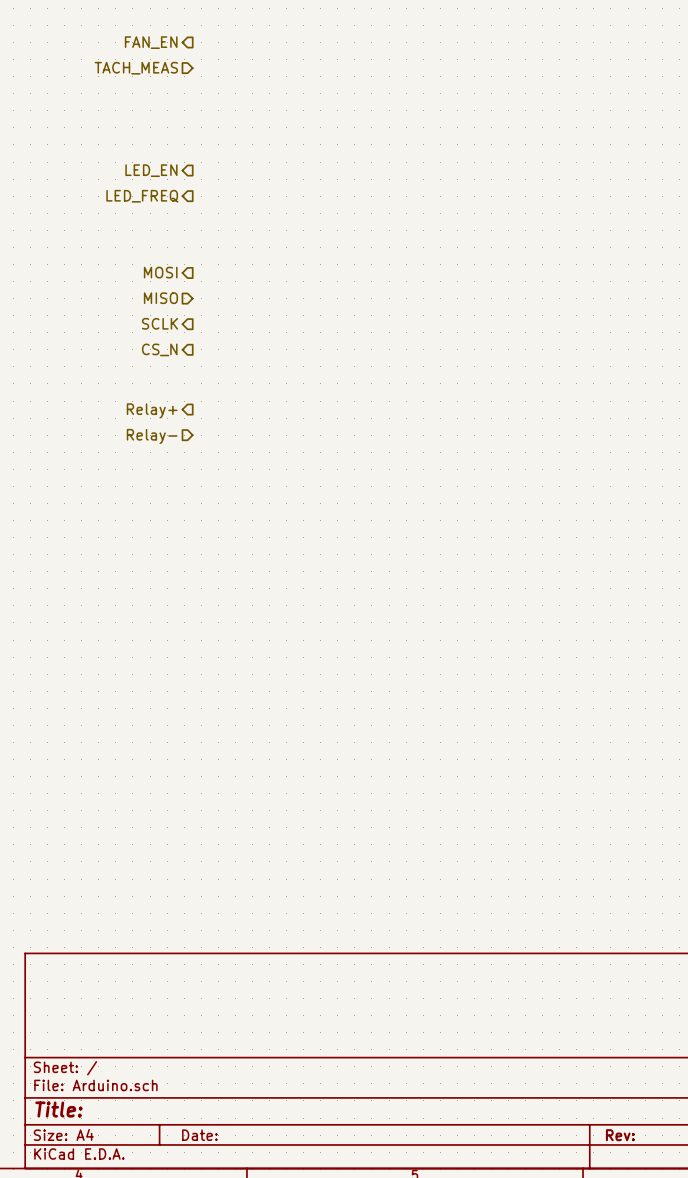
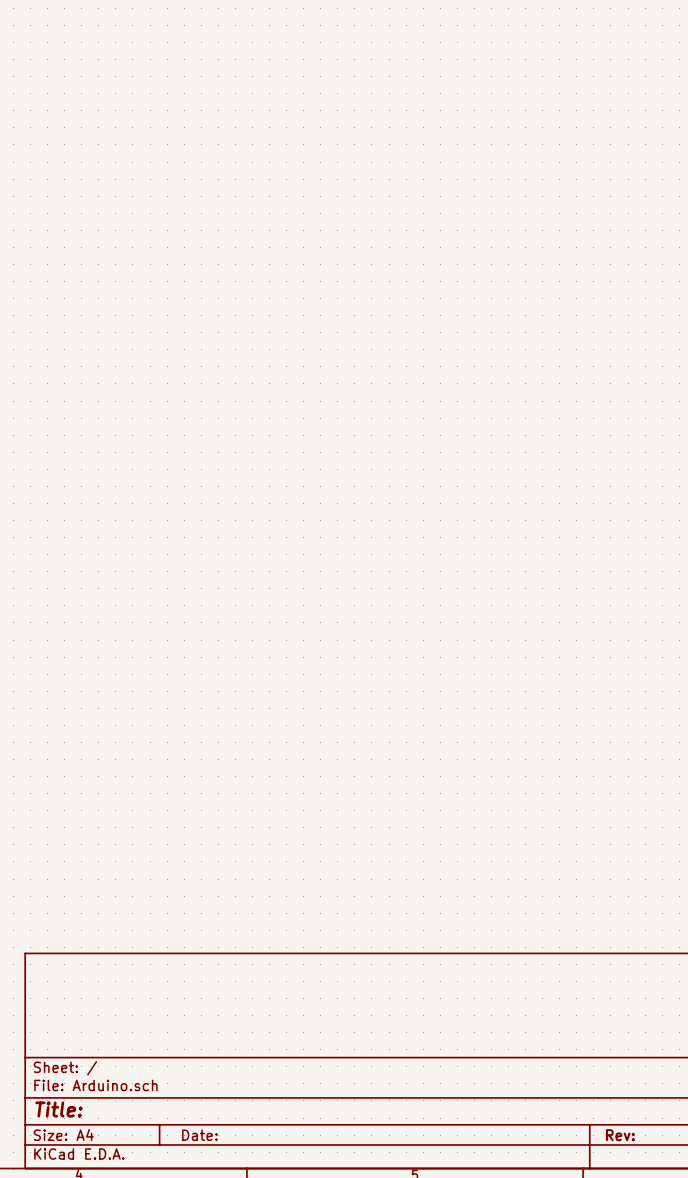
hierarchical label: FAN_EN (151, 42) -> none
hierarchical label: TACH_MEAS (136, 68) -> none
hierarchical label: LED_EN (151, 170) -> none
hierarchical label: LED_FREQ (142, 196) -> none
hierarchical label: MOSI (160, 272) -> none
hierarchical label: MISO (160, 298) -> none
hierarchical label: SCLK (159, 323) -> none
hierarchical label: CS_N (159, 349) -> none
hierarchical label: Relay+ (152, 410) -> none
hierarchical label: Relay- (152, 436) -> none

